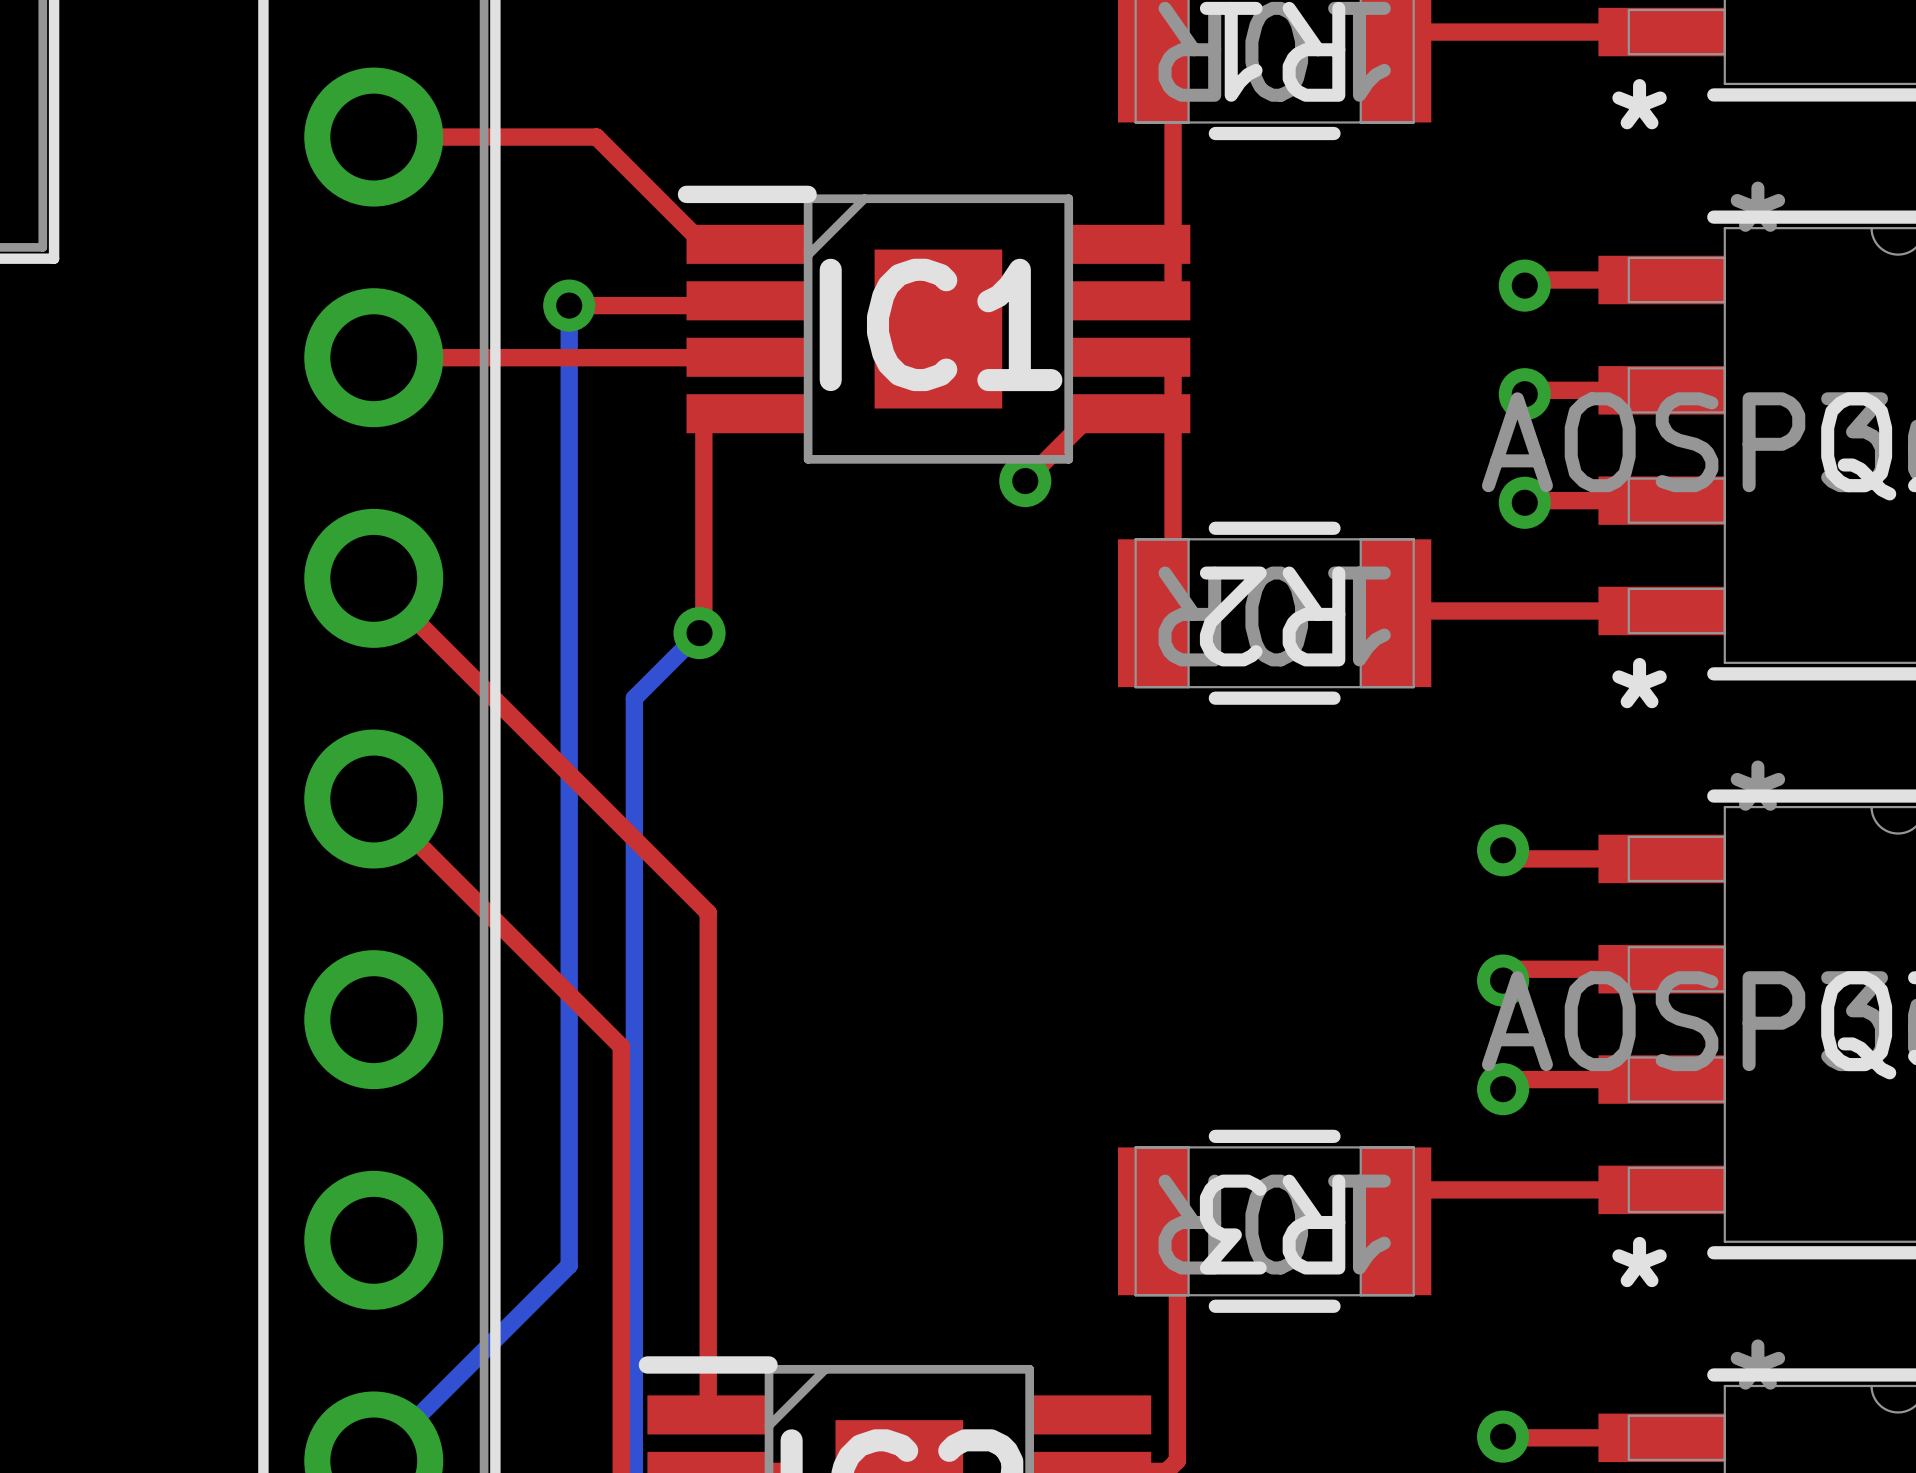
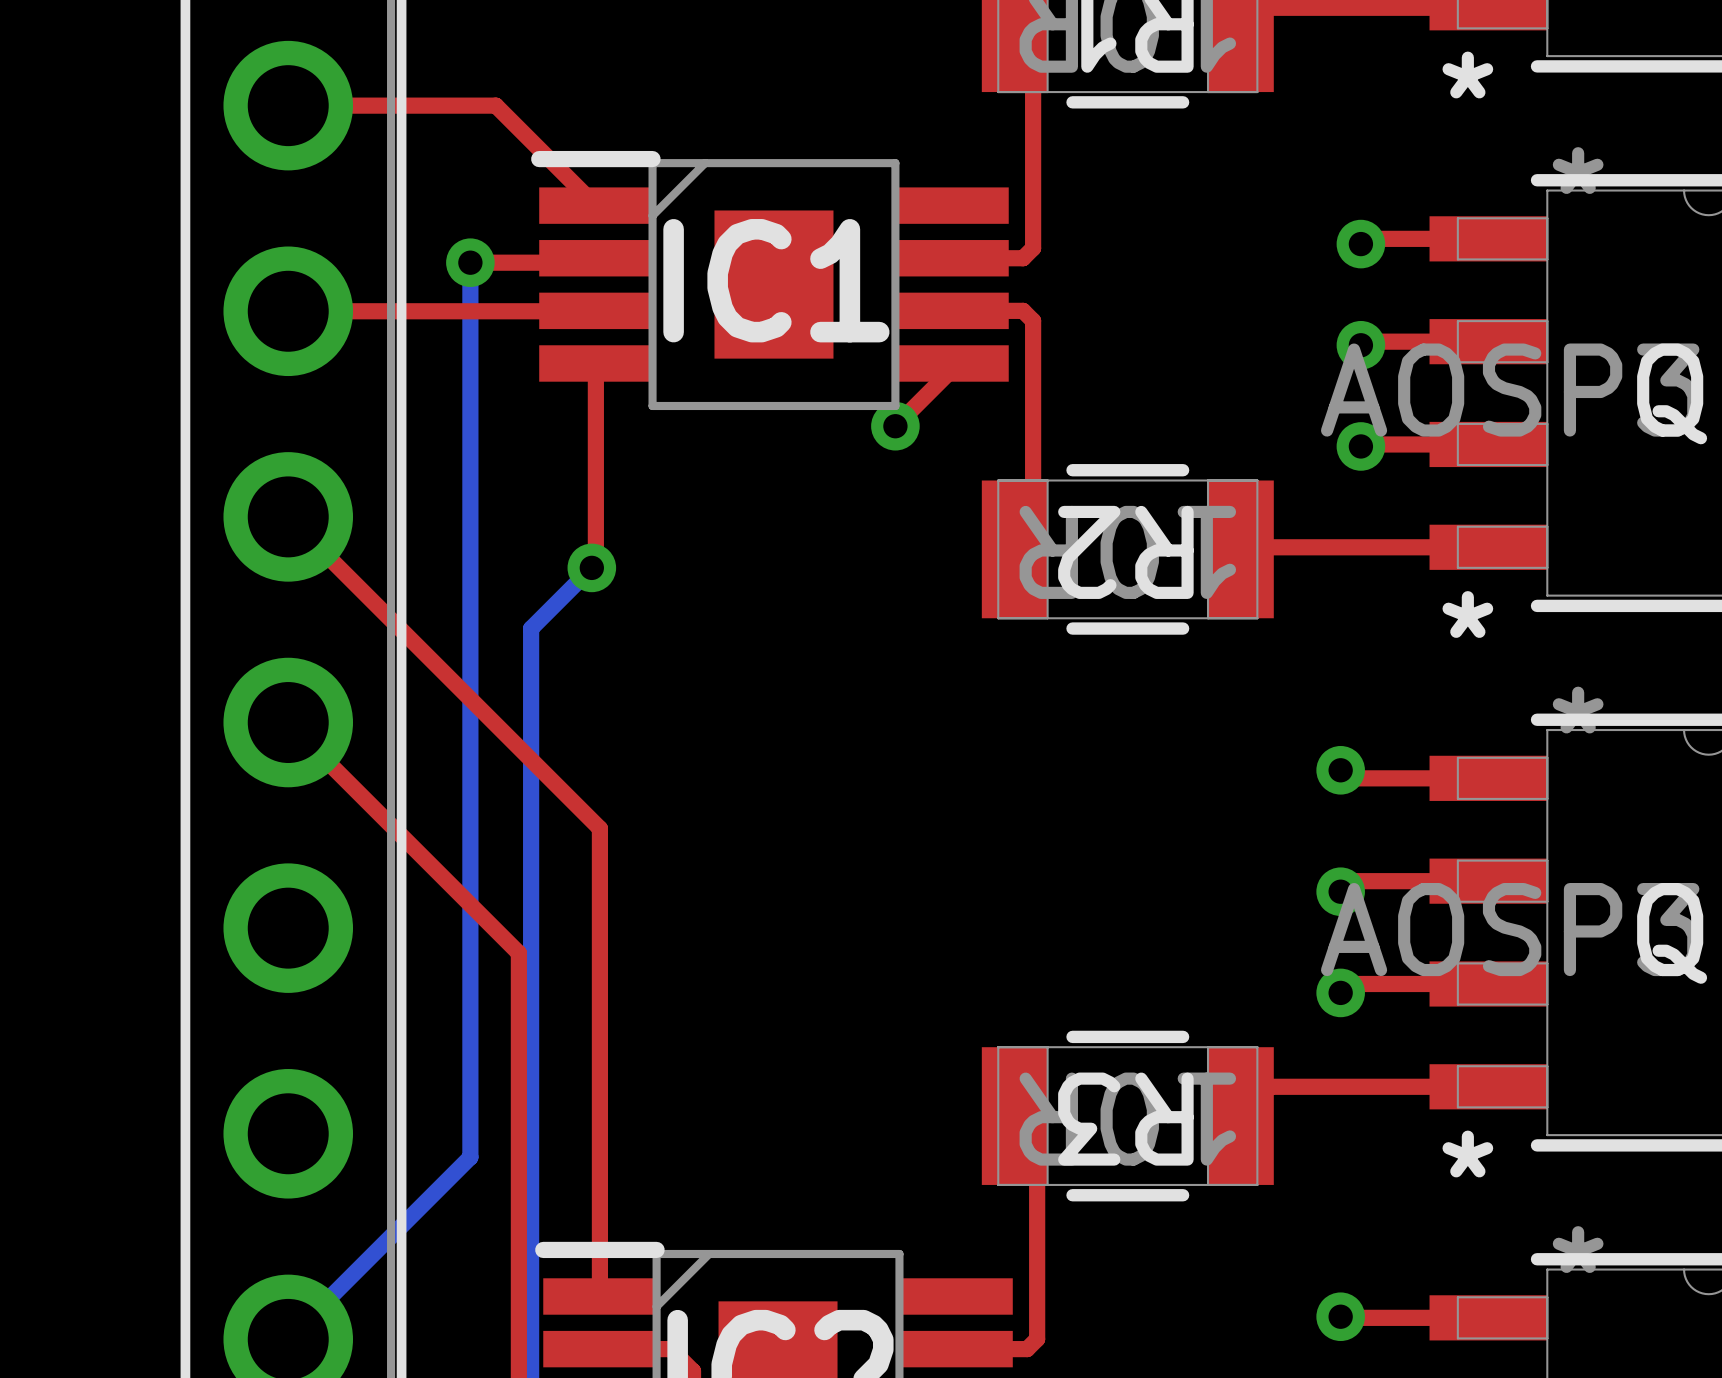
IC1 position: (934, 324) -> (769, 280)

